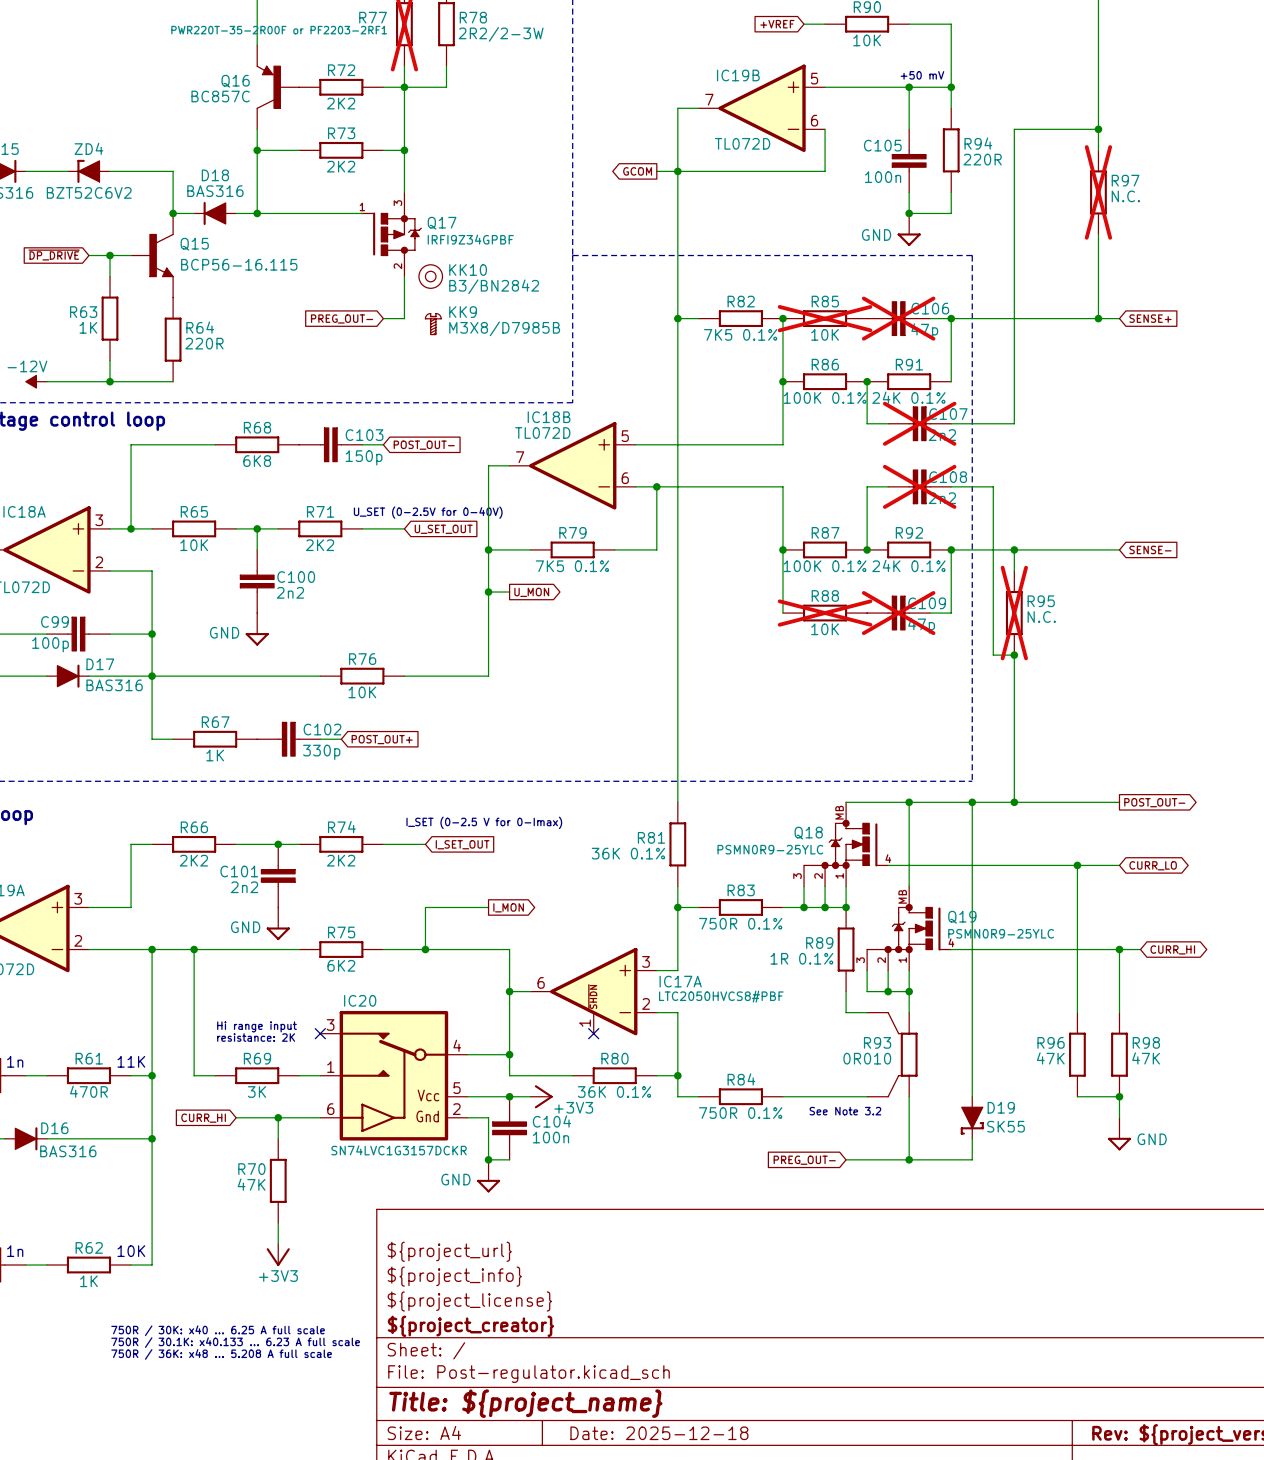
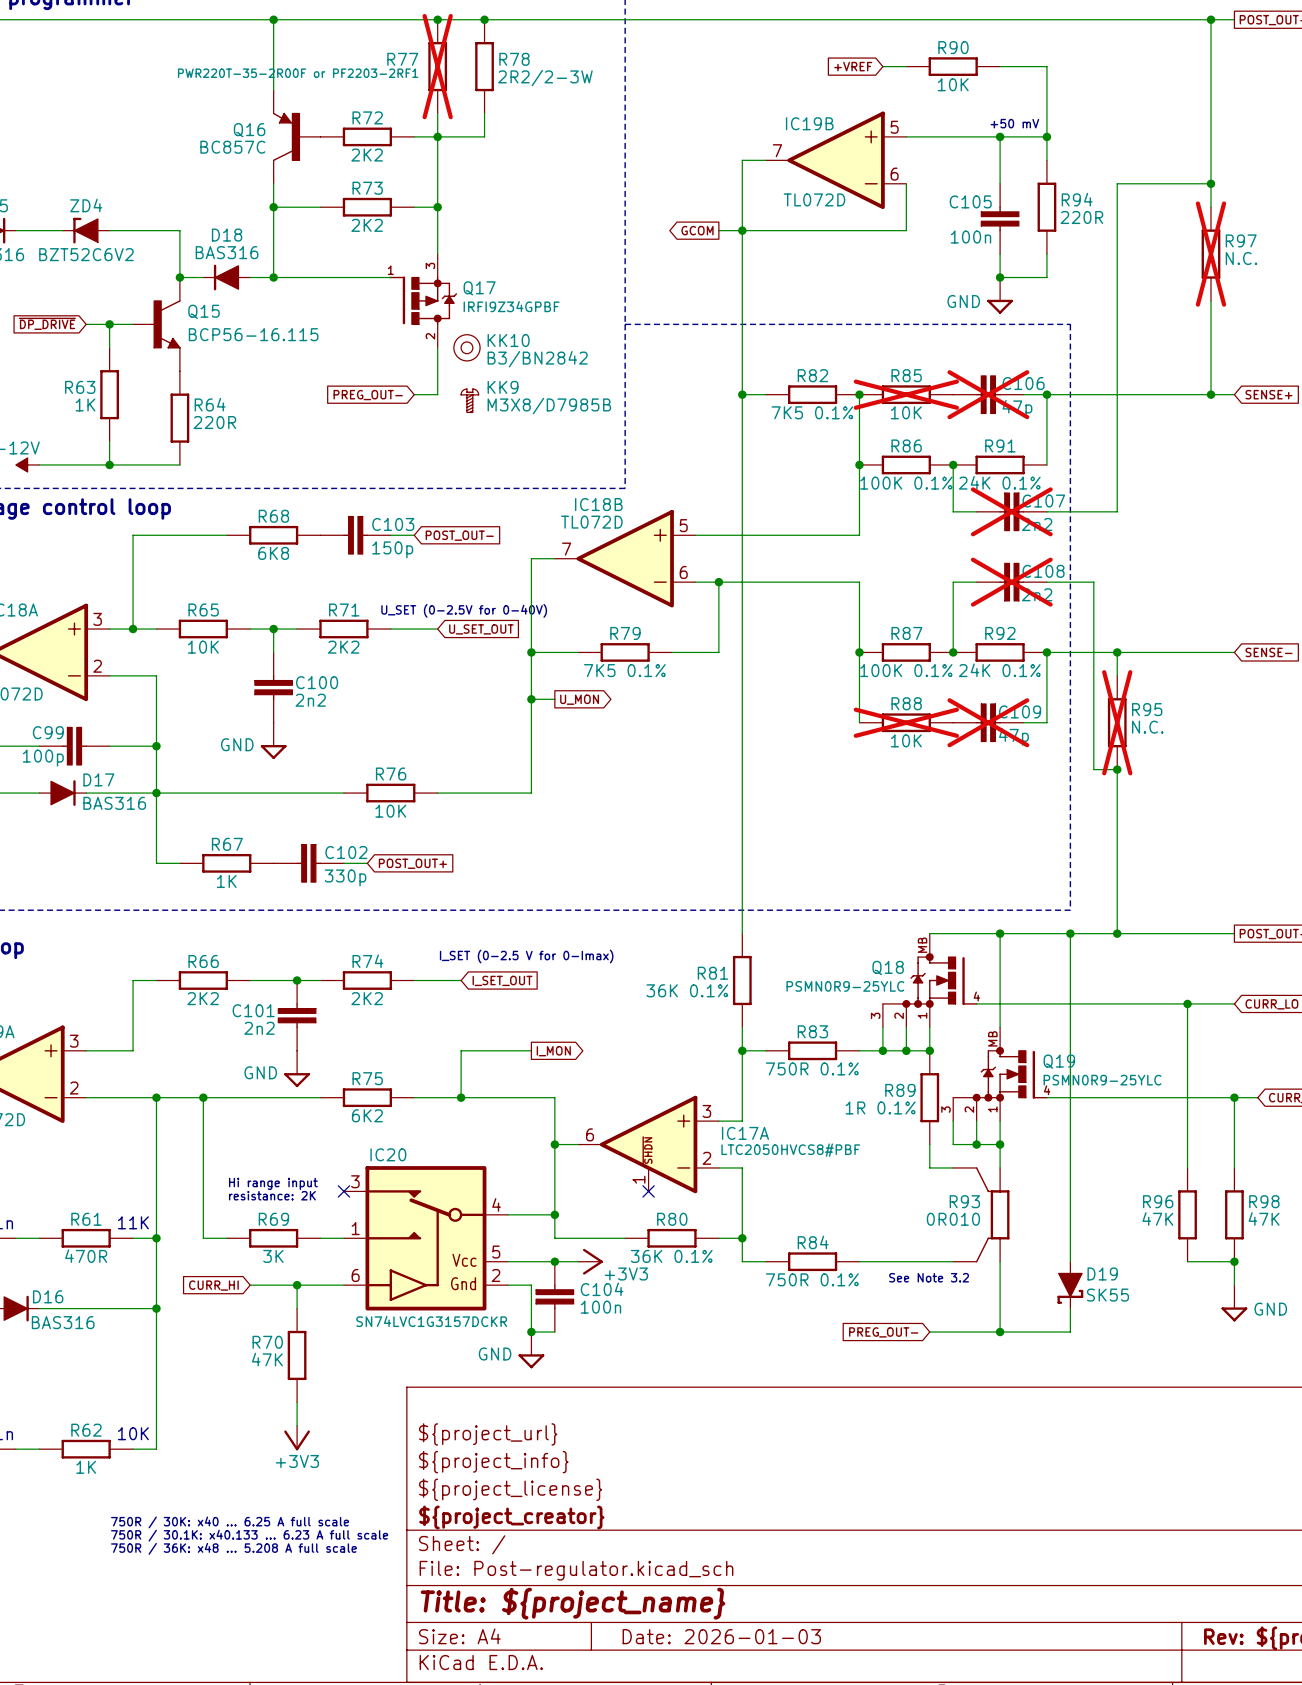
title block: Date: 2025-12-18 (659, 1433) -> Date: 2026-01-03 (721, 1636)

